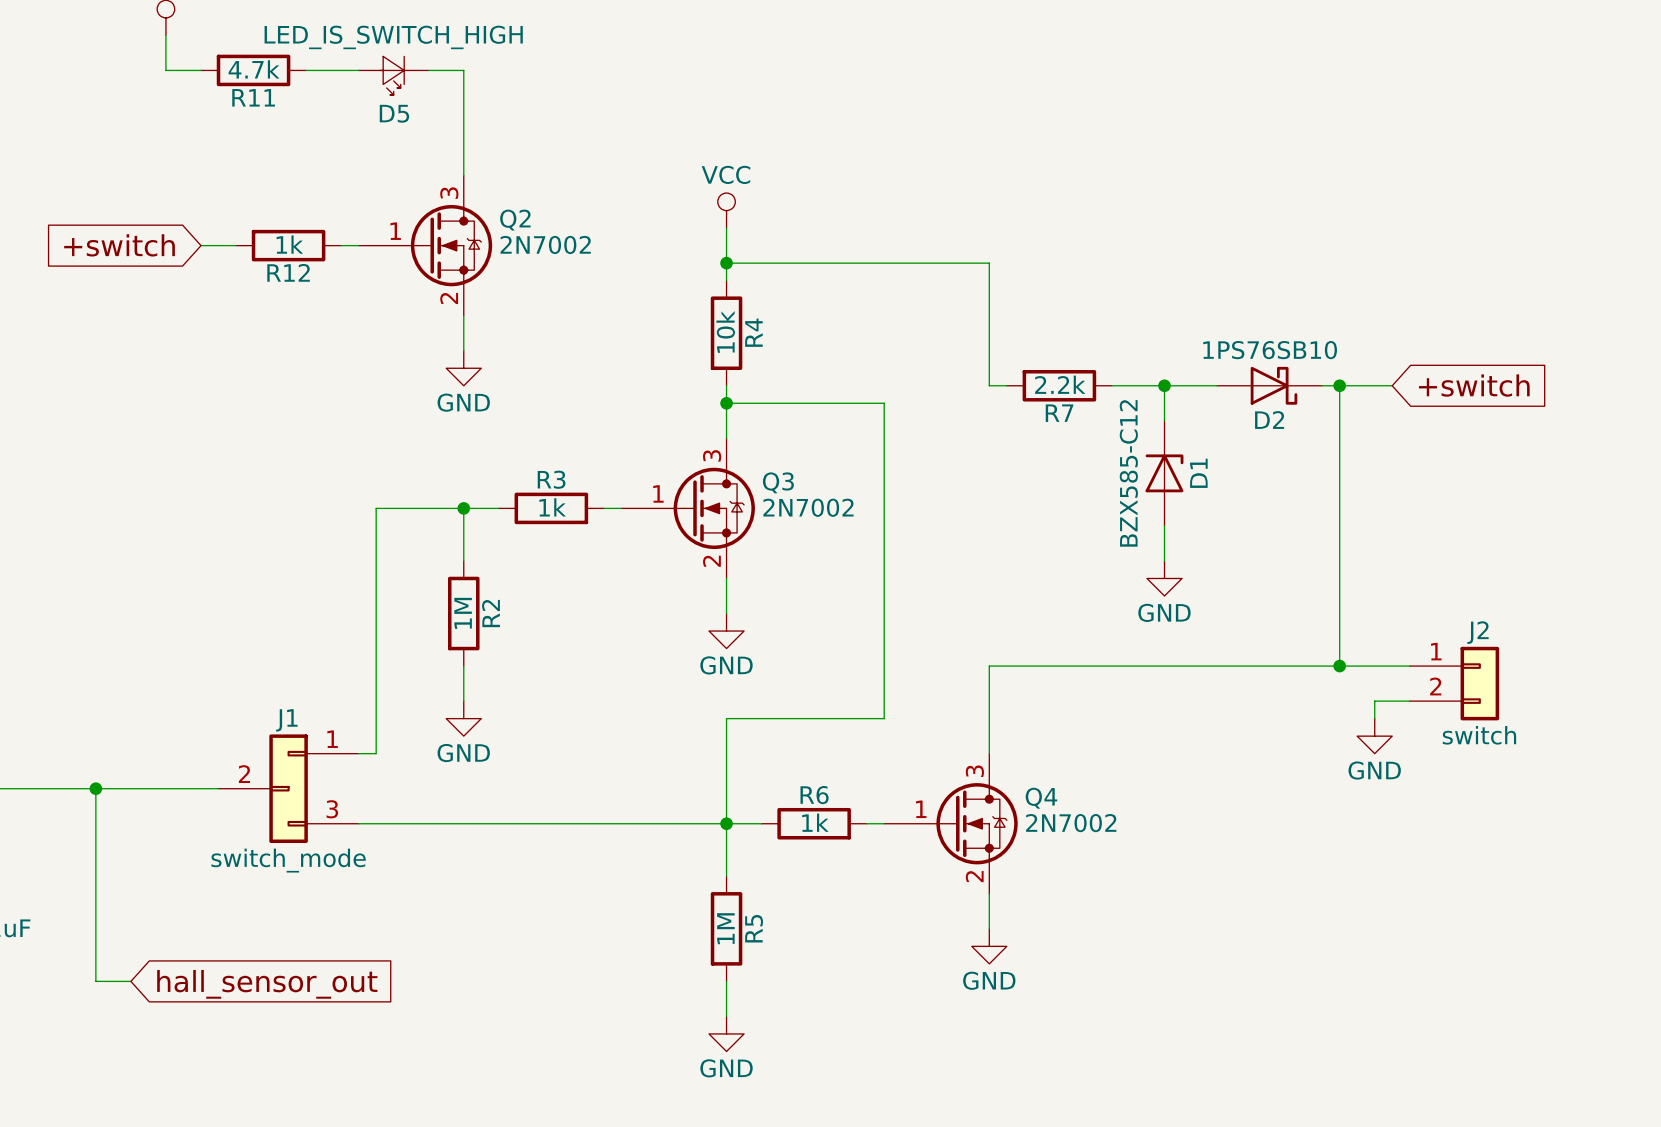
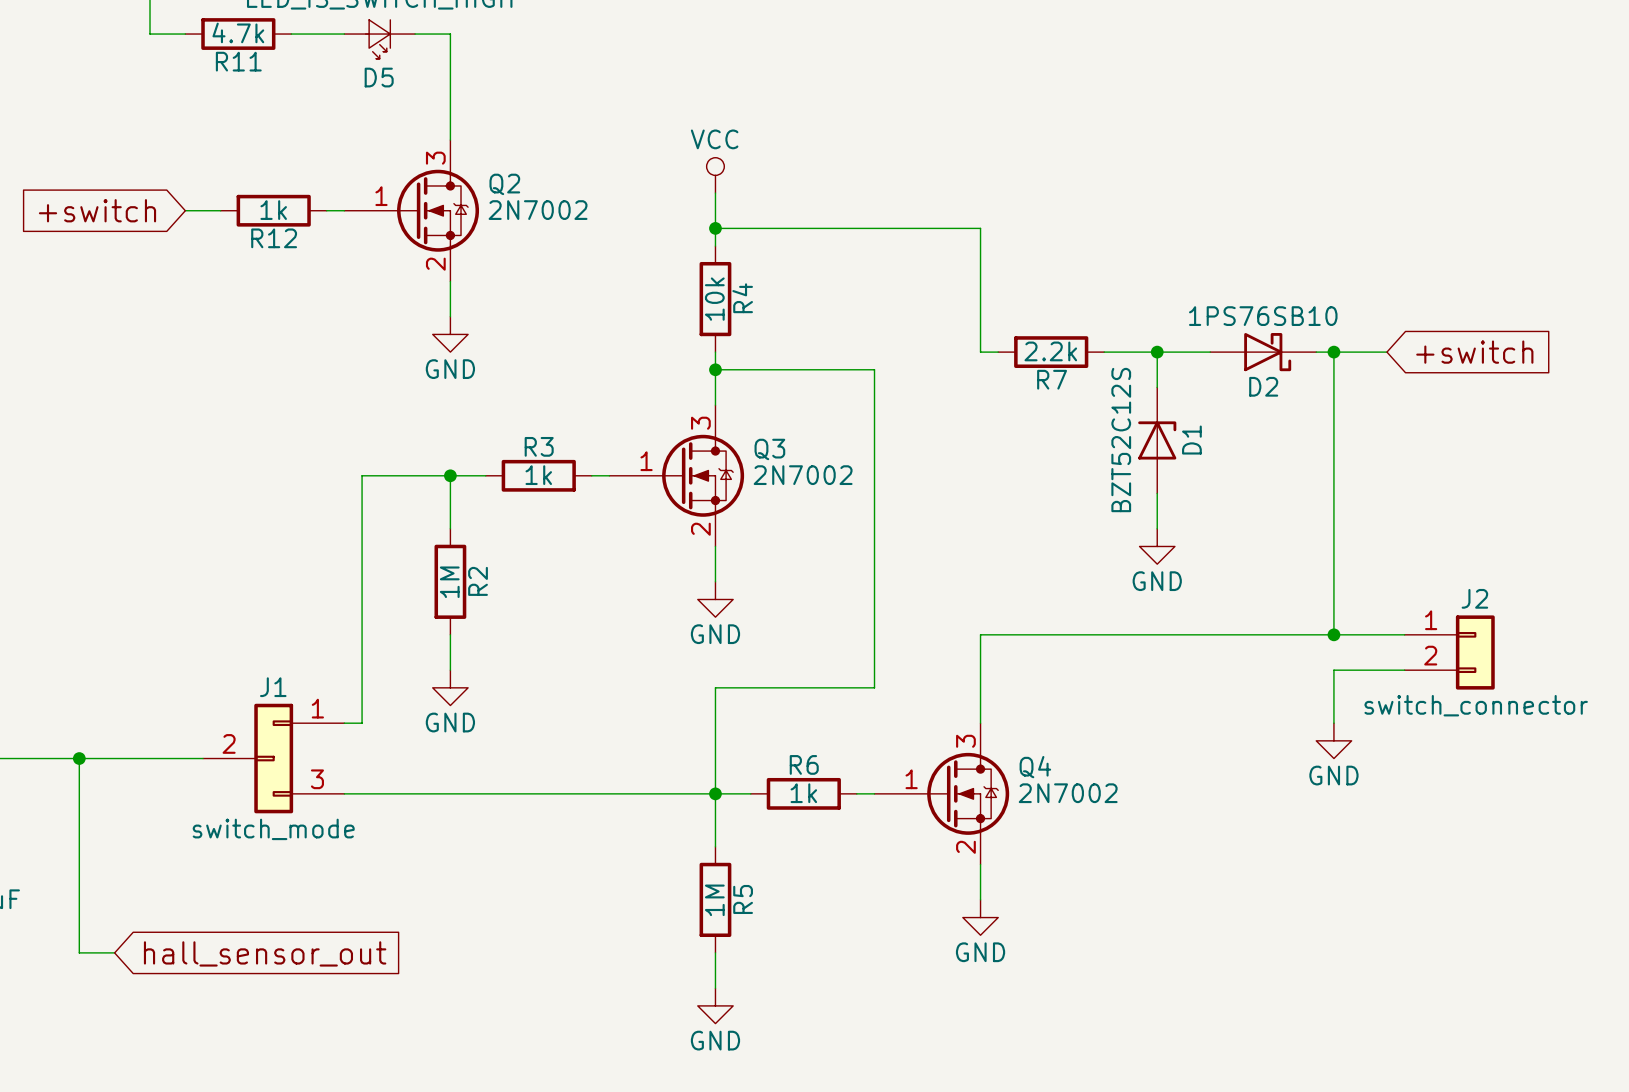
D1 value: BZX585-C12 (1128, 473) -> BZT52C12S (1121, 440)
wire: (1374, 701) (1374, 718) -> (1369, 670) (1333, 670) (1333, 723)
J2 value: switch (1479, 735) -> switch_connector (1476, 705)
power symbol position: GND (1374, 736) -> GND (1333, 740)

